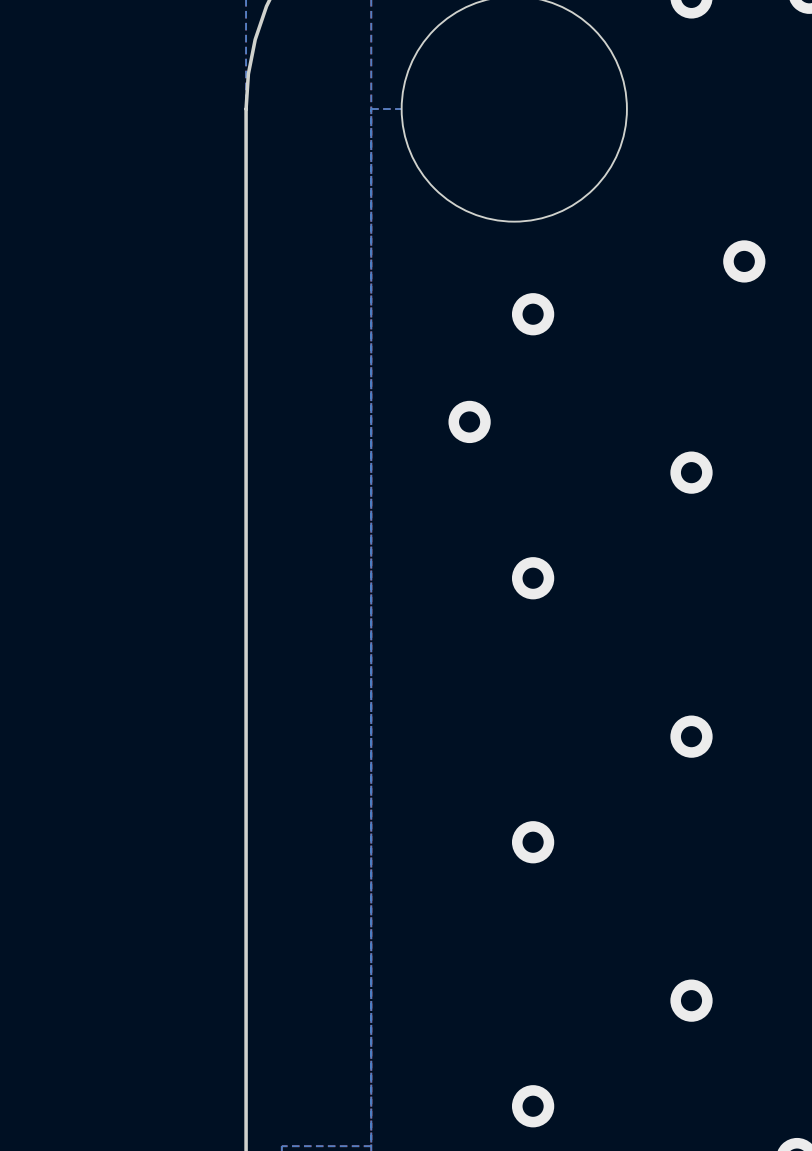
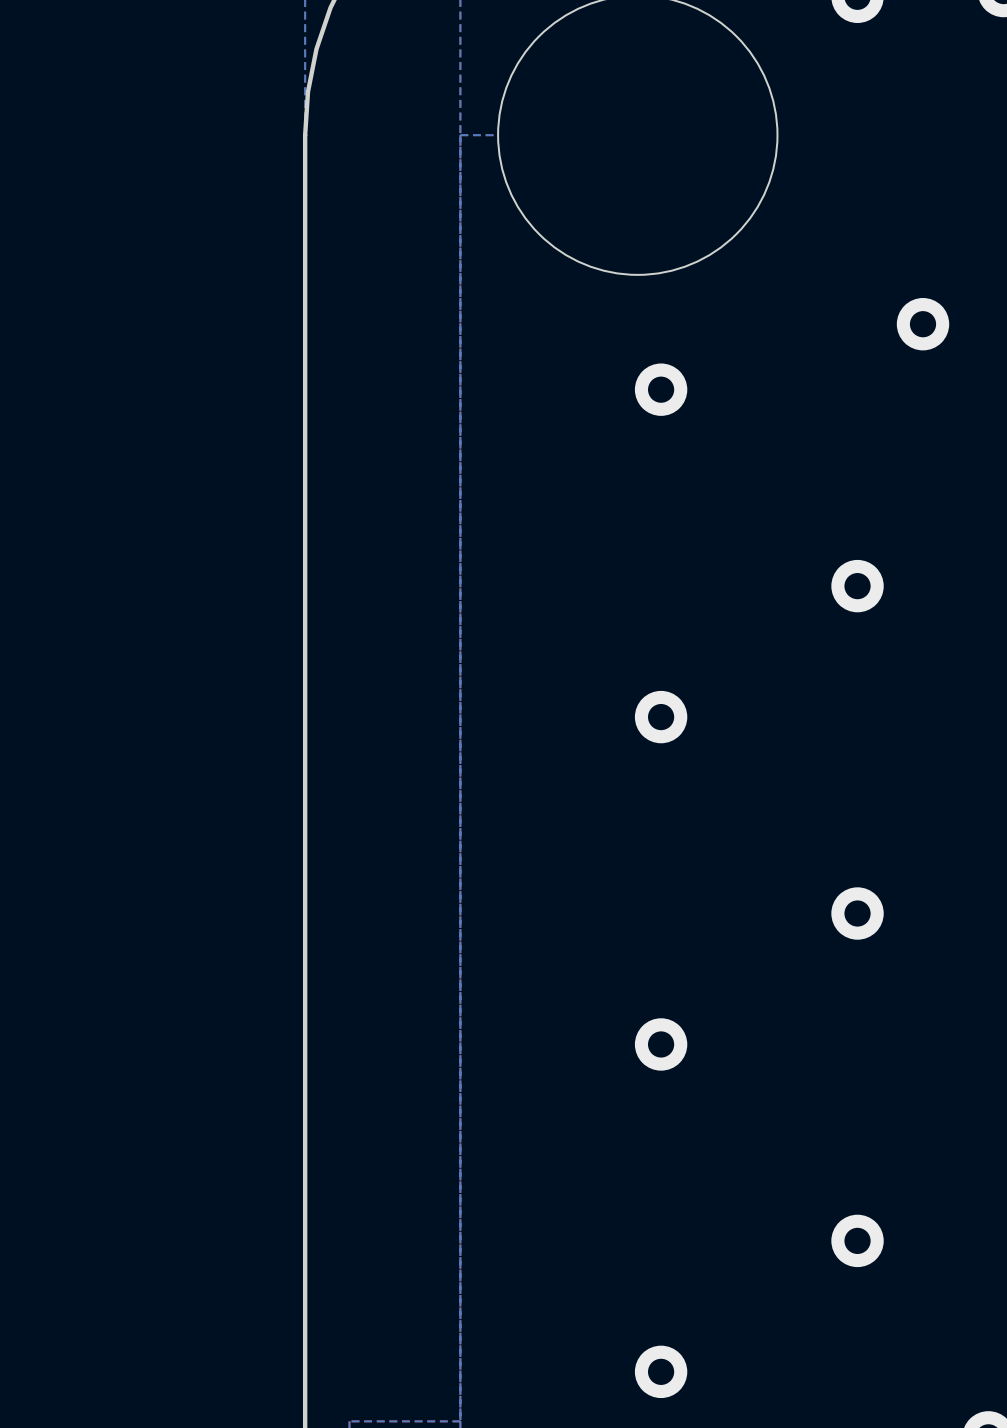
via: (469, 421) -> none

